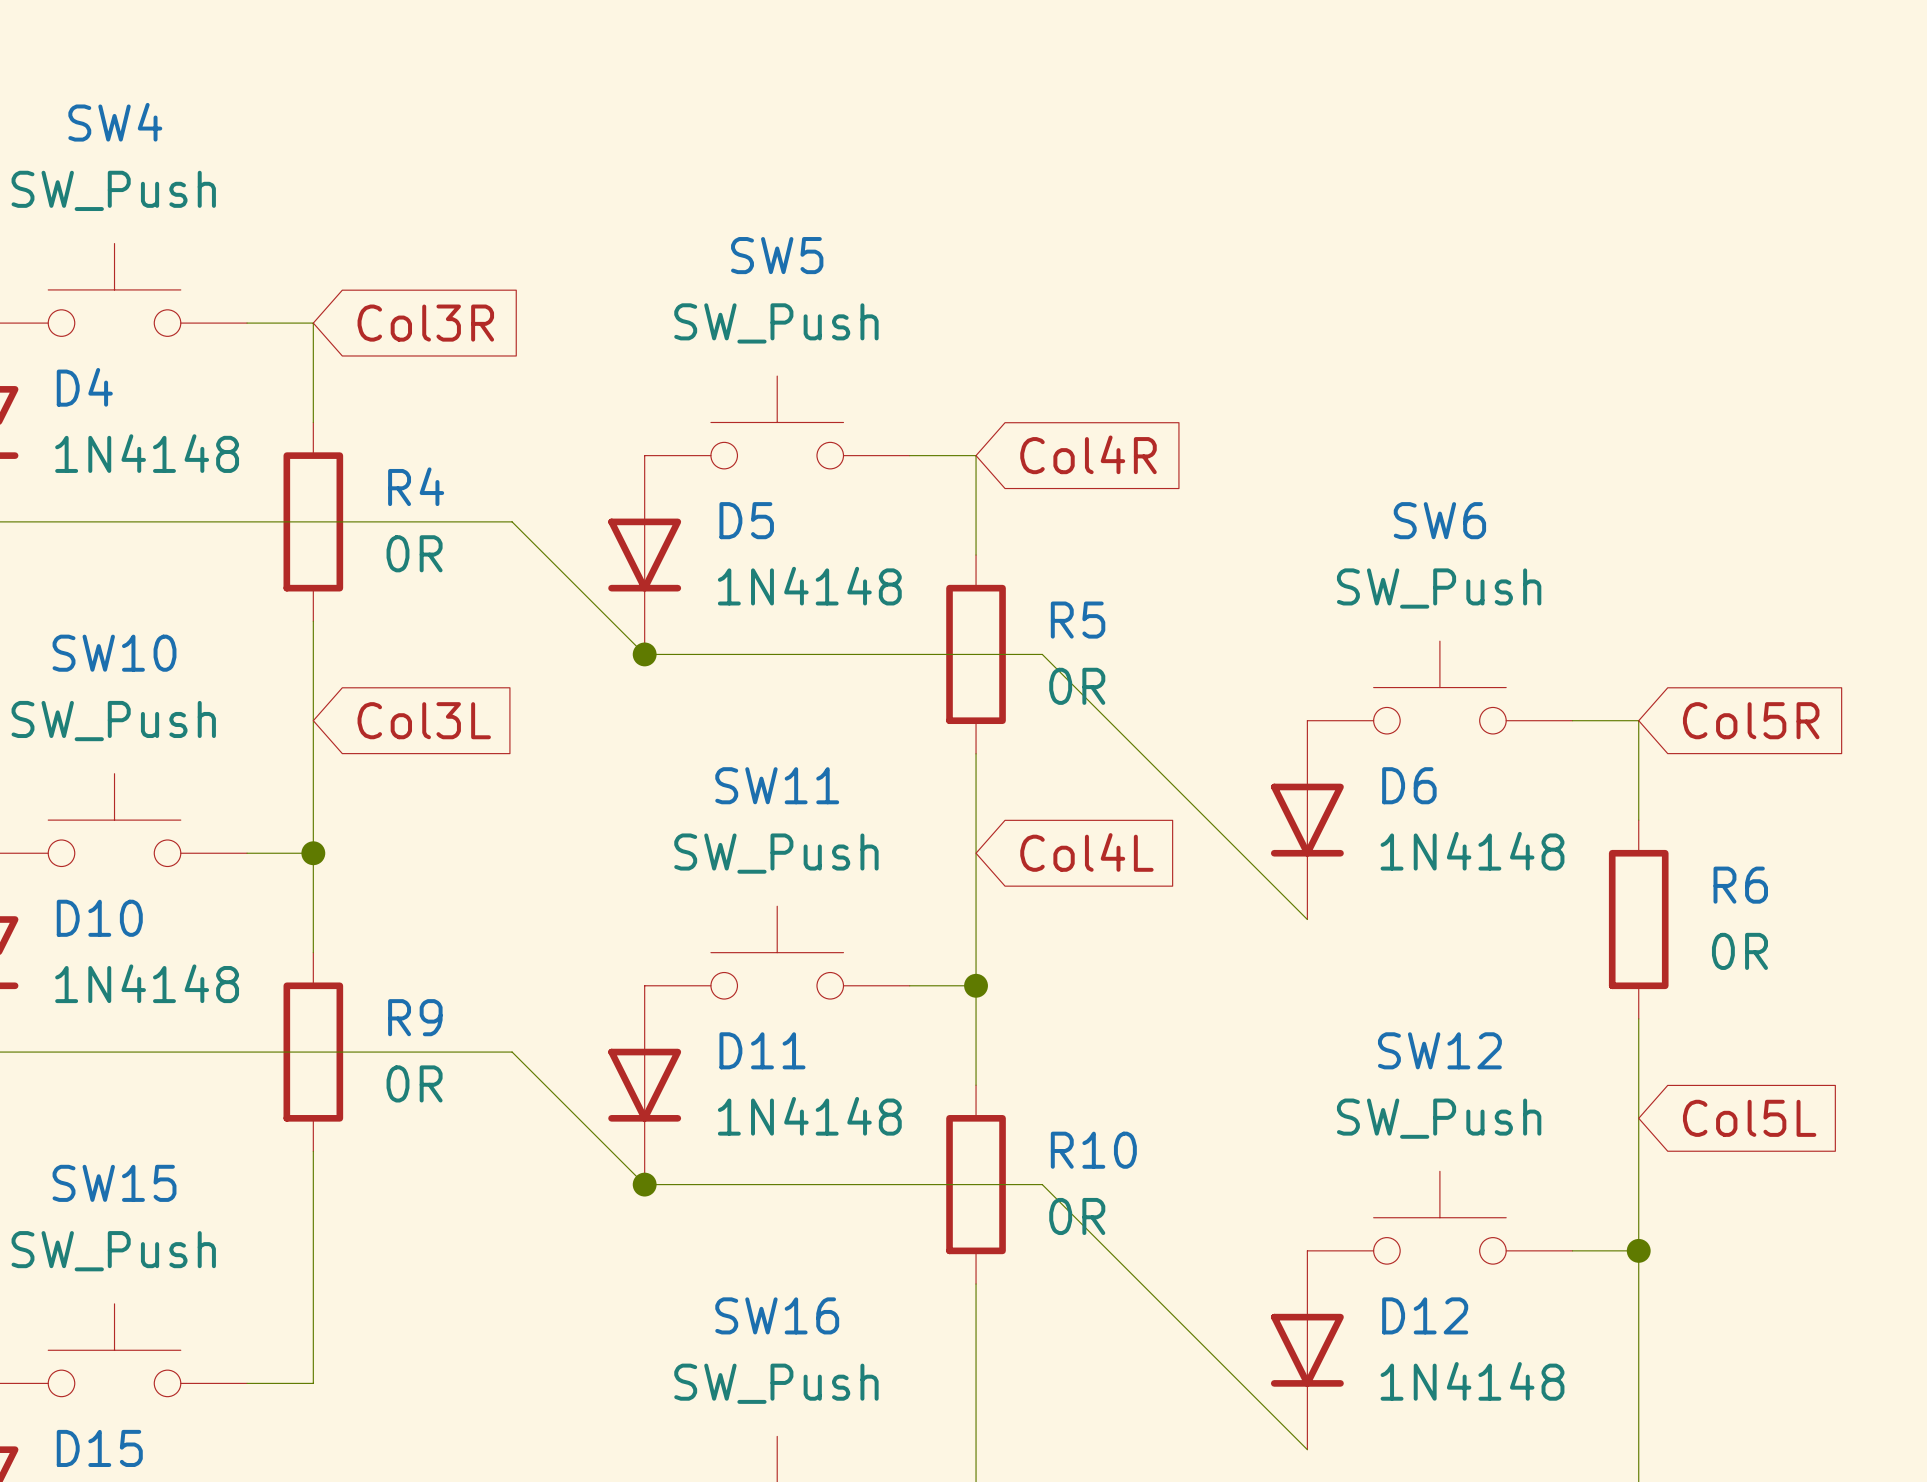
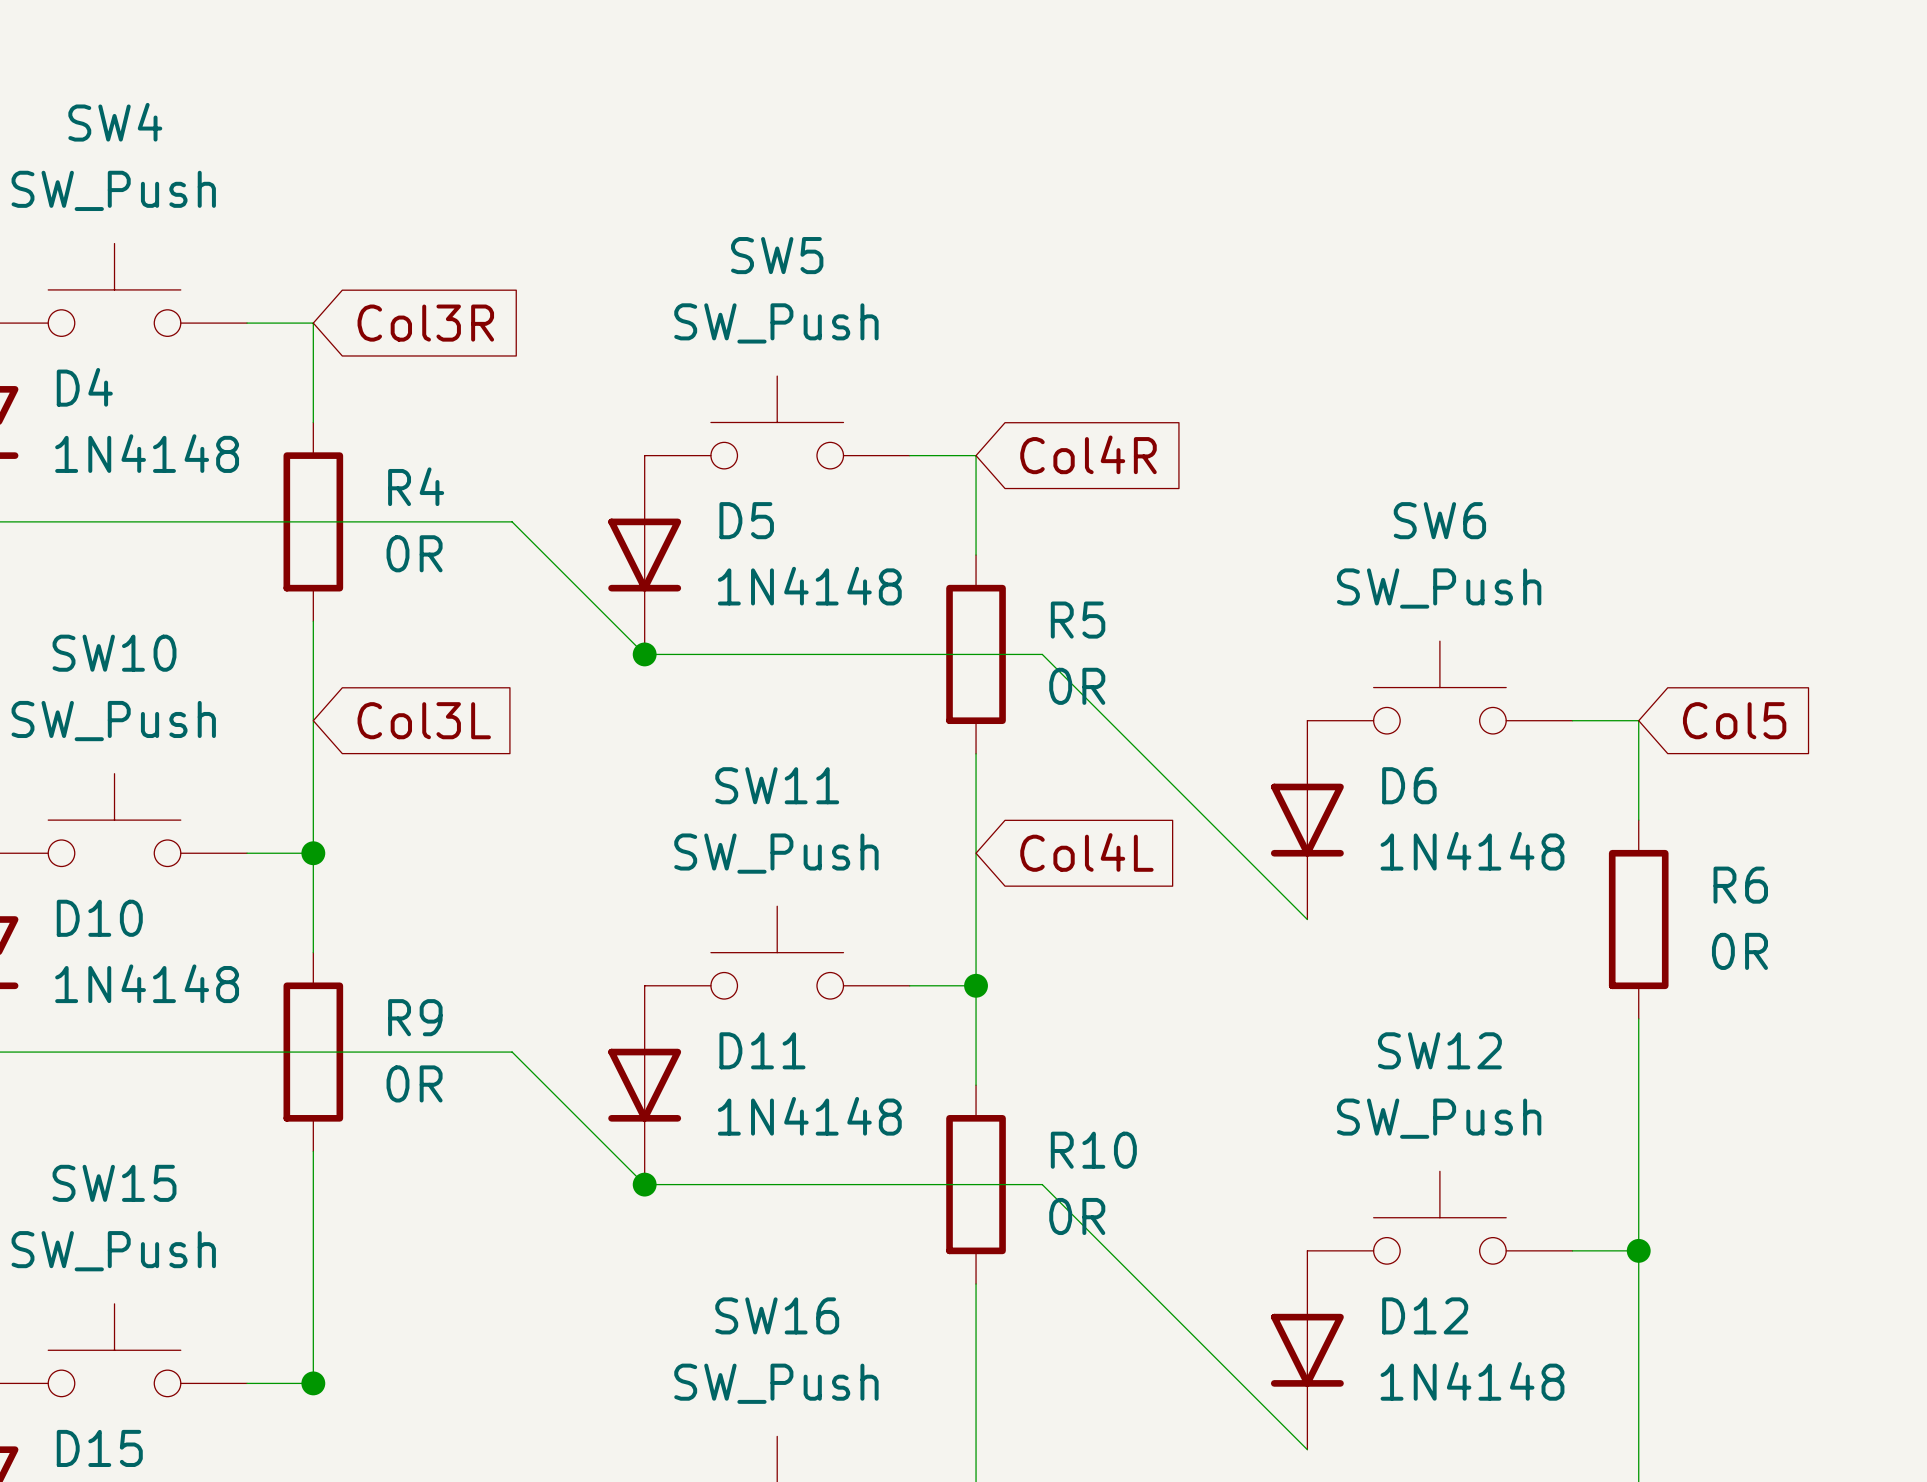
global label: Col5R (1751, 720) -> Col5 (1734, 720)
global label: Col5L (1749, 1118) -> none
junction: none -> (313, 1383)

